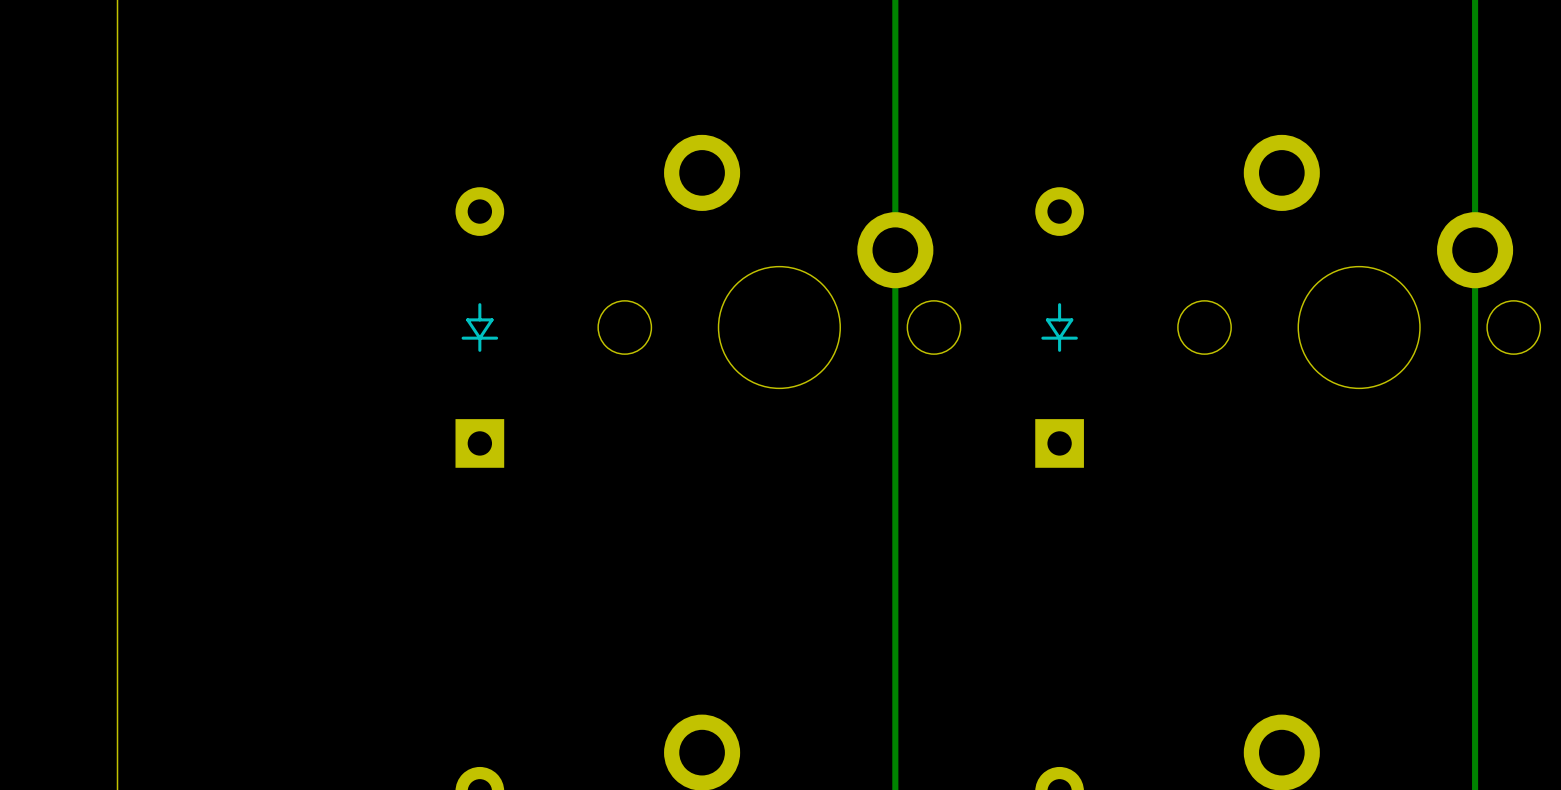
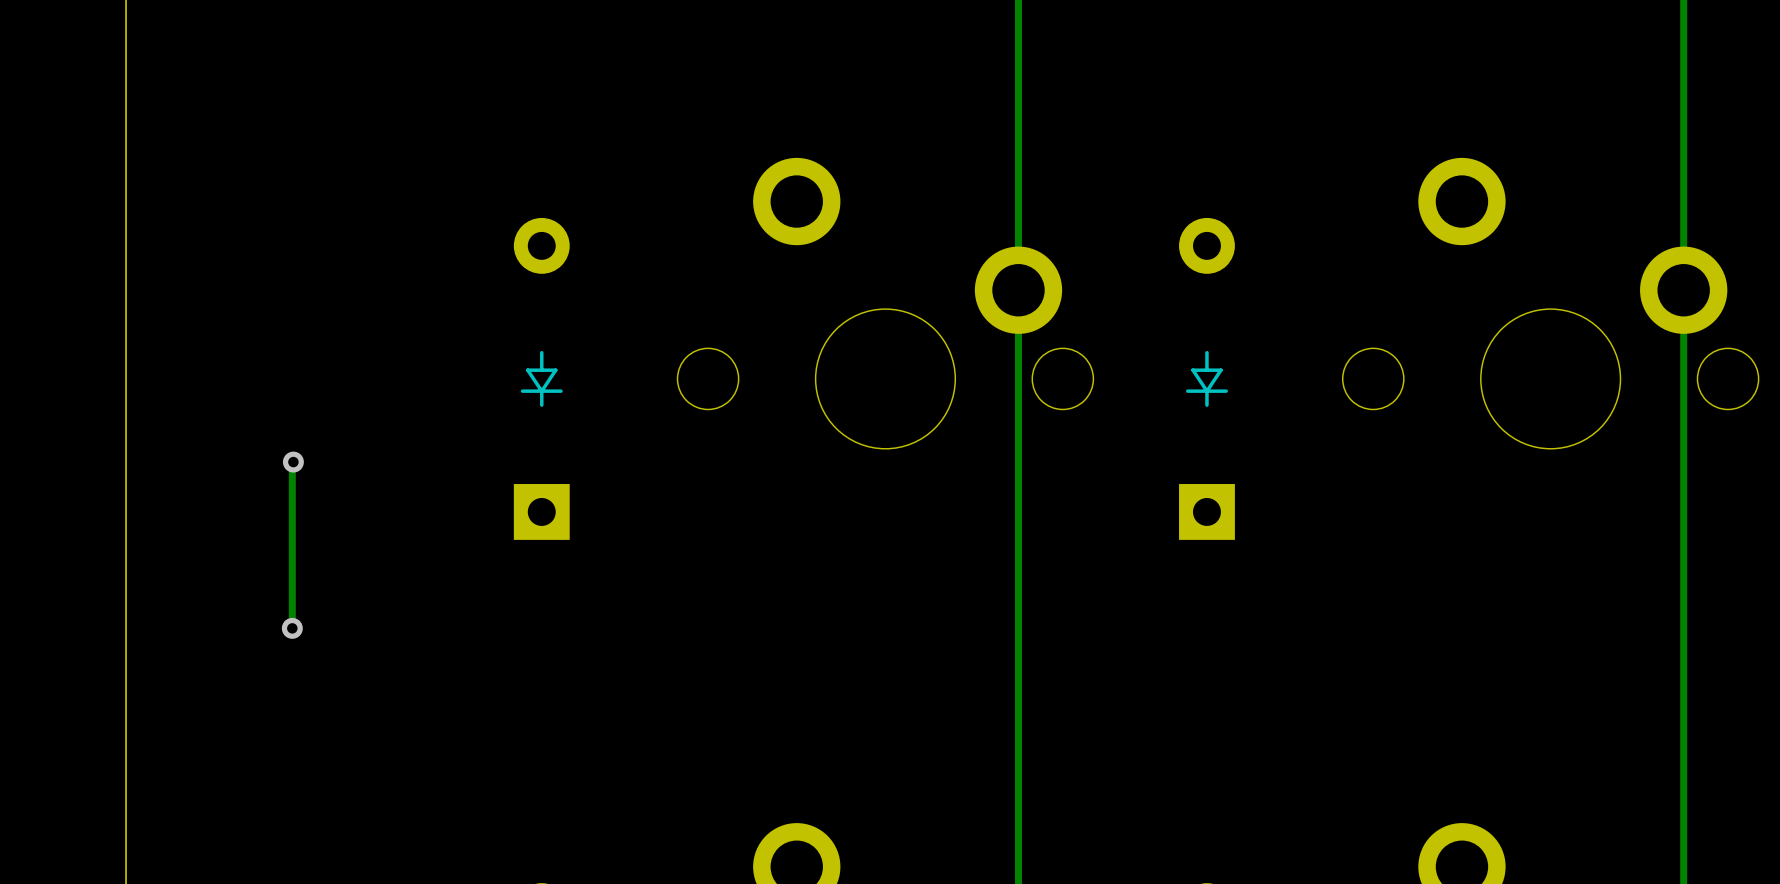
track: none -> (293, 462) (292, 628)
via: none -> (293, 462)
via: none -> (292, 628)

